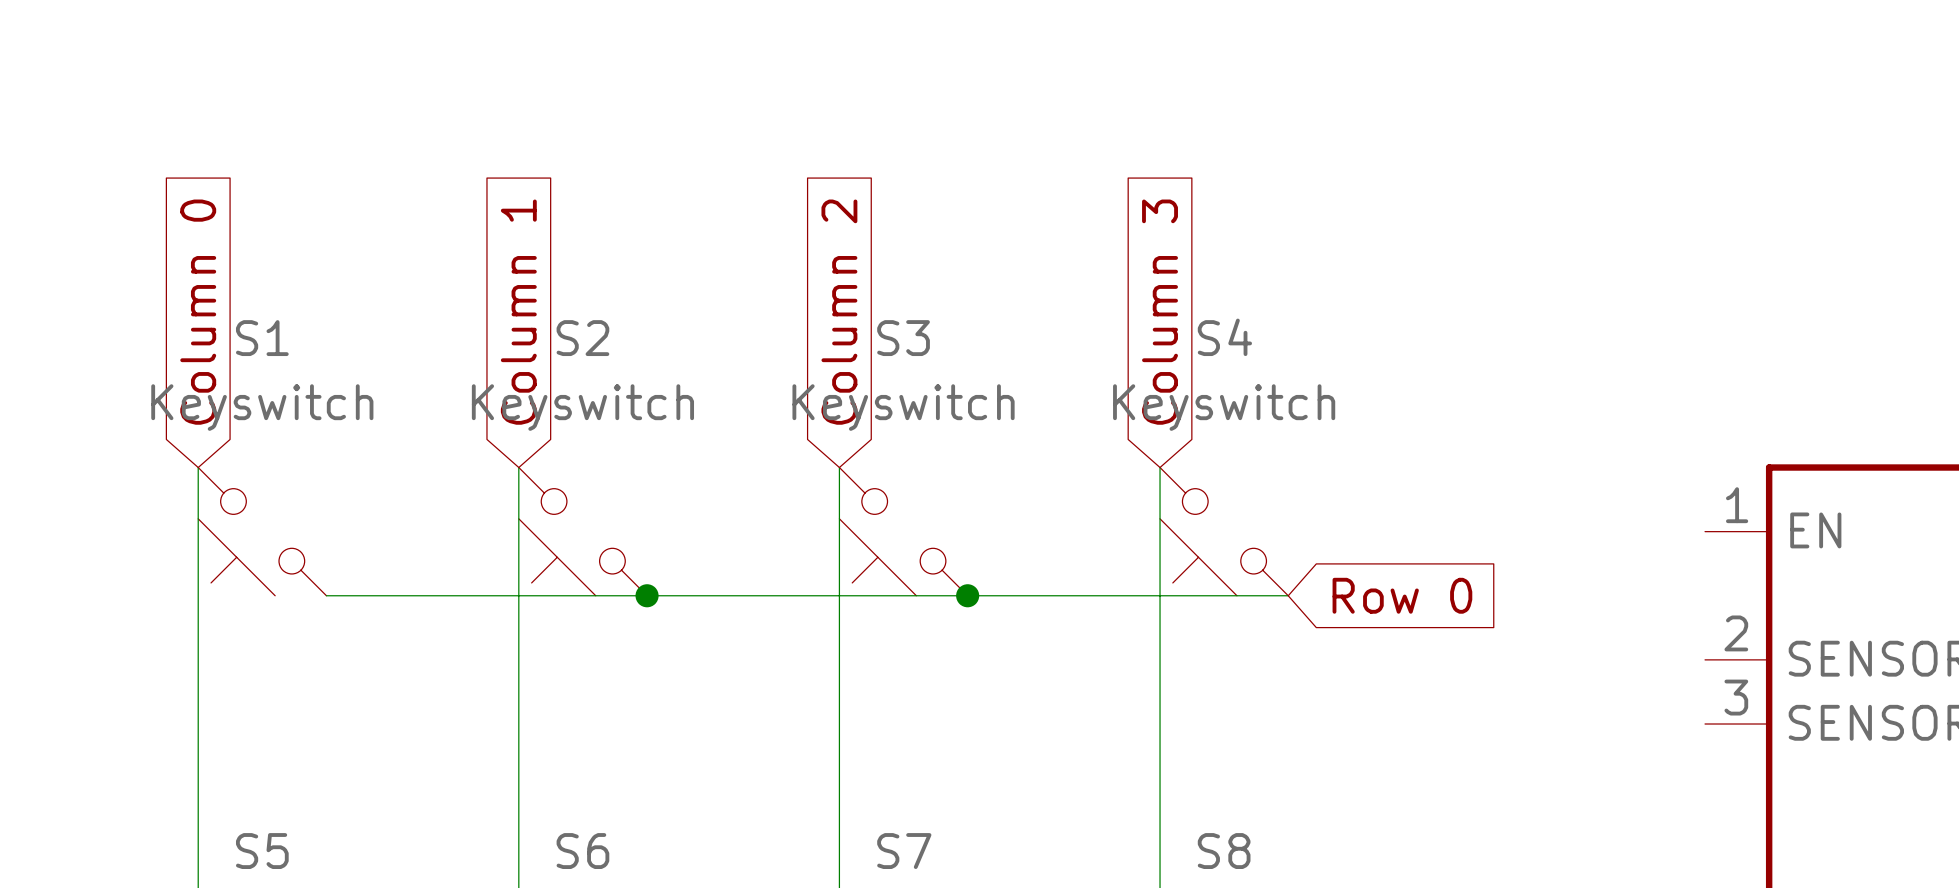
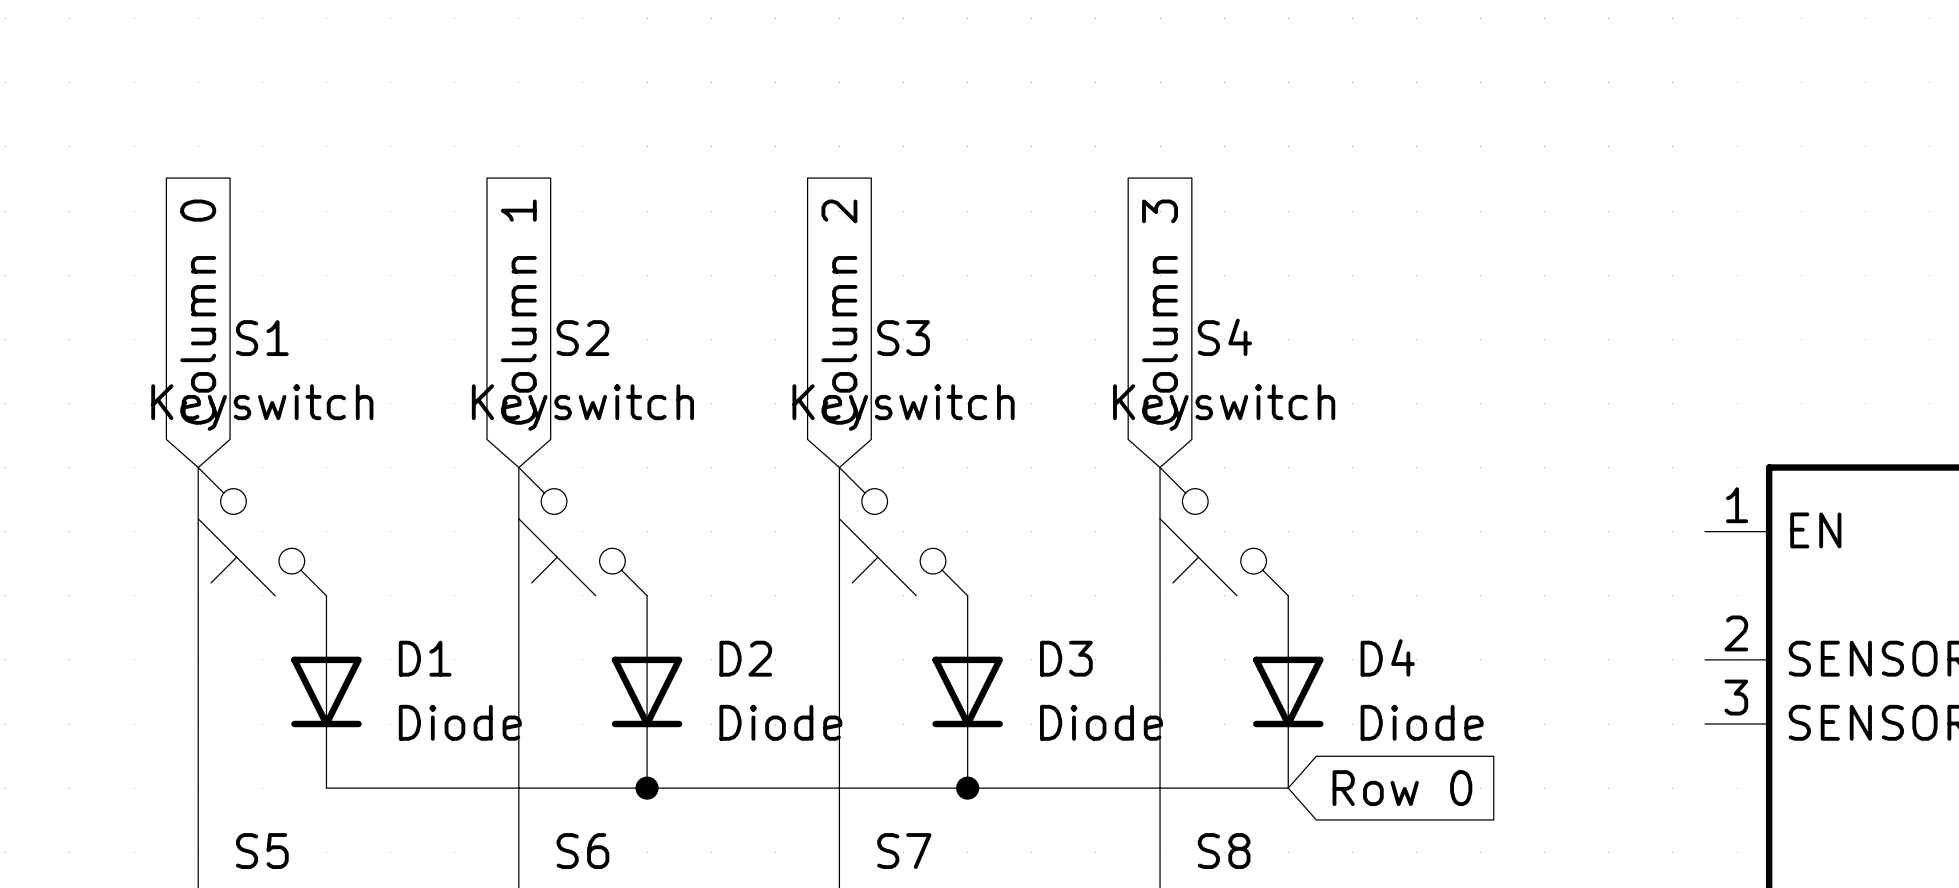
wire: (326, 595) (1288, 595) -> (326, 788) (1288, 788)
junction: (647, 595) -> none
junction: (967, 595) -> none
global label position: Row 0 (1402, 595) -> Row 0 (1402, 788)
D1: none -> Diode (326, 691)
D2: none -> Diode (647, 691)
D3: none -> Diode (967, 691)
D4: none -> Diode (1288, 691)
junction: none -> (647, 788)
junction: none -> (967, 788)

